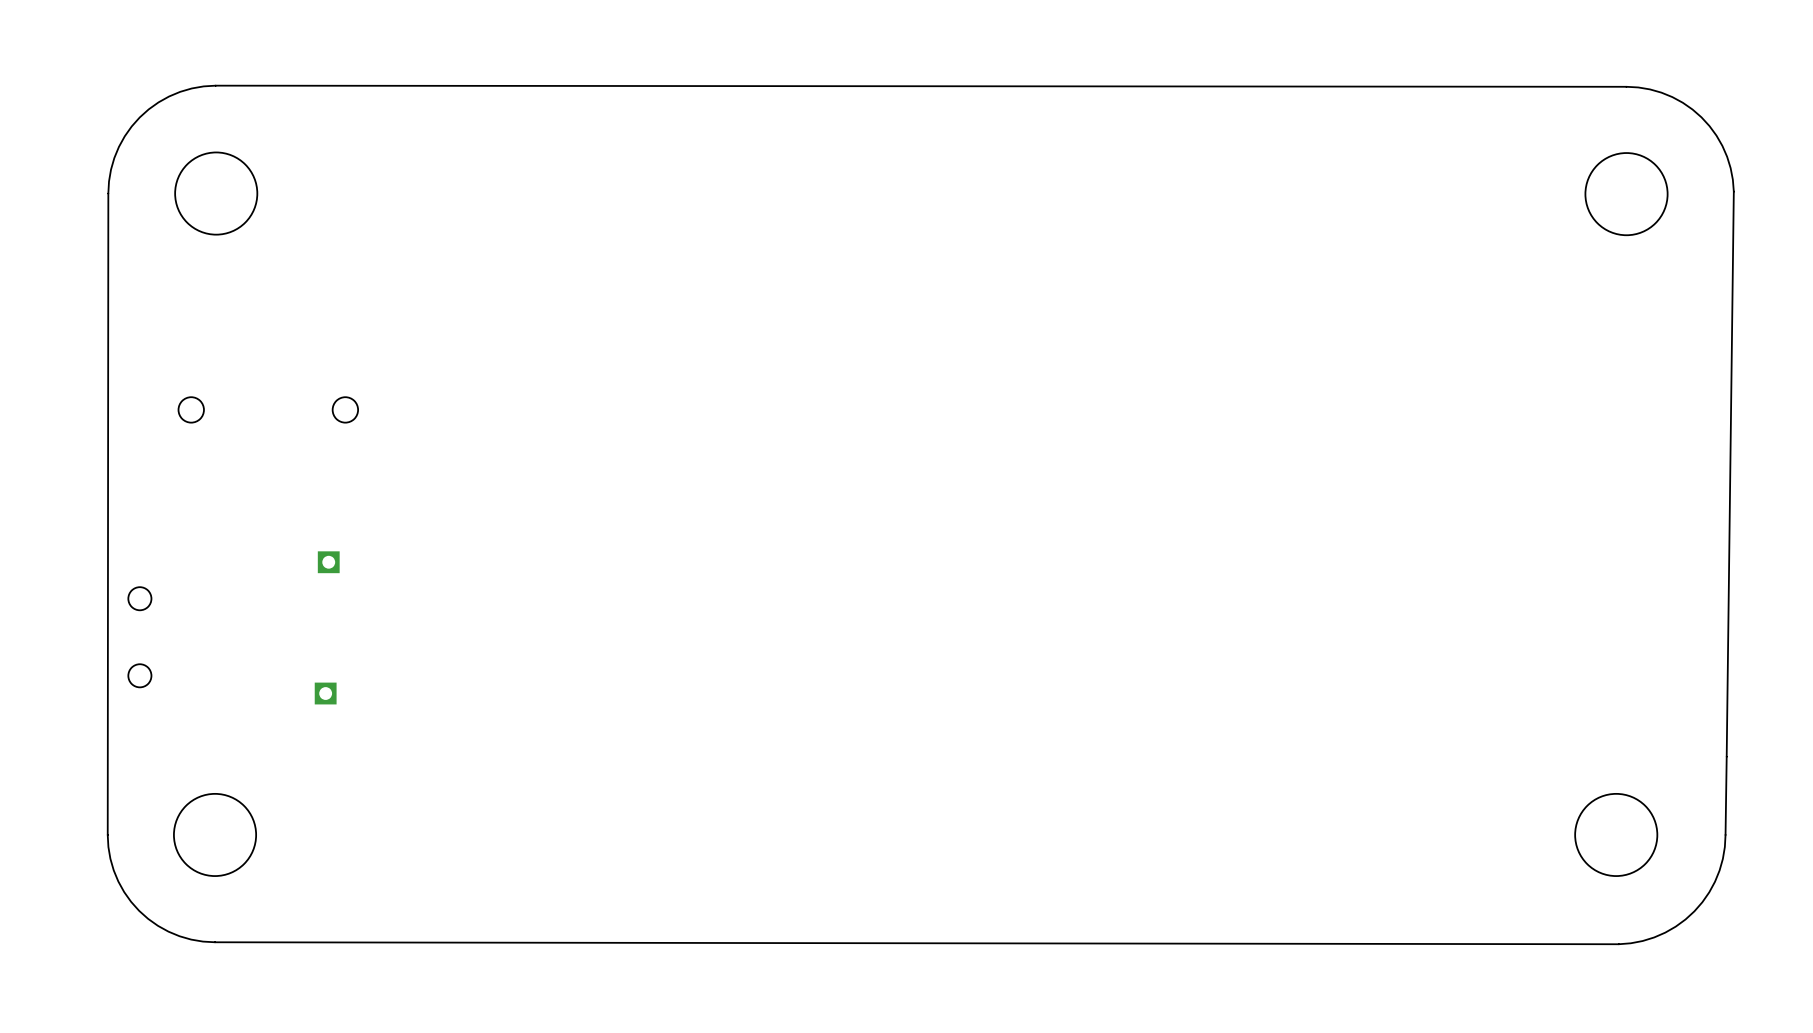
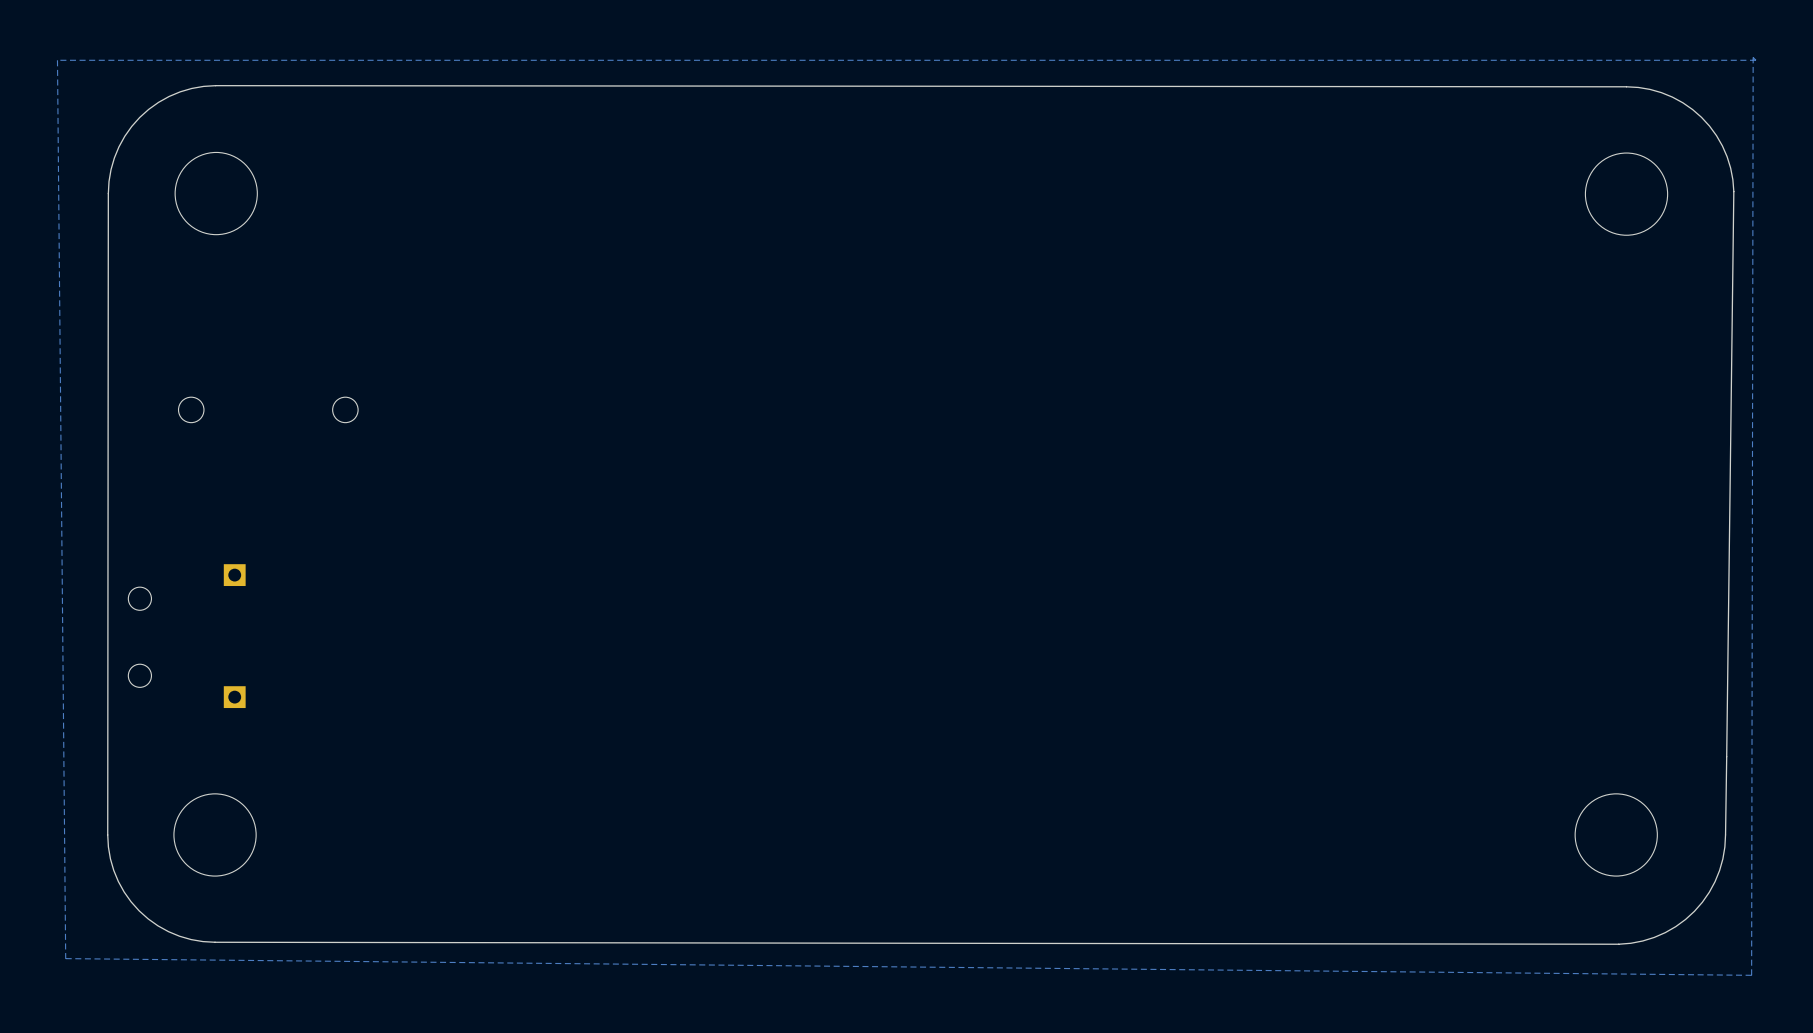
zone outline: none -> (1753, 57) (1751, 975) (65, 958) (57, 60) (1755, 60) (1753, 57)
part: (328, 562) -> none
part: none -> (234, 575)
part: (325, 693) -> none
part: none -> (234, 697)

